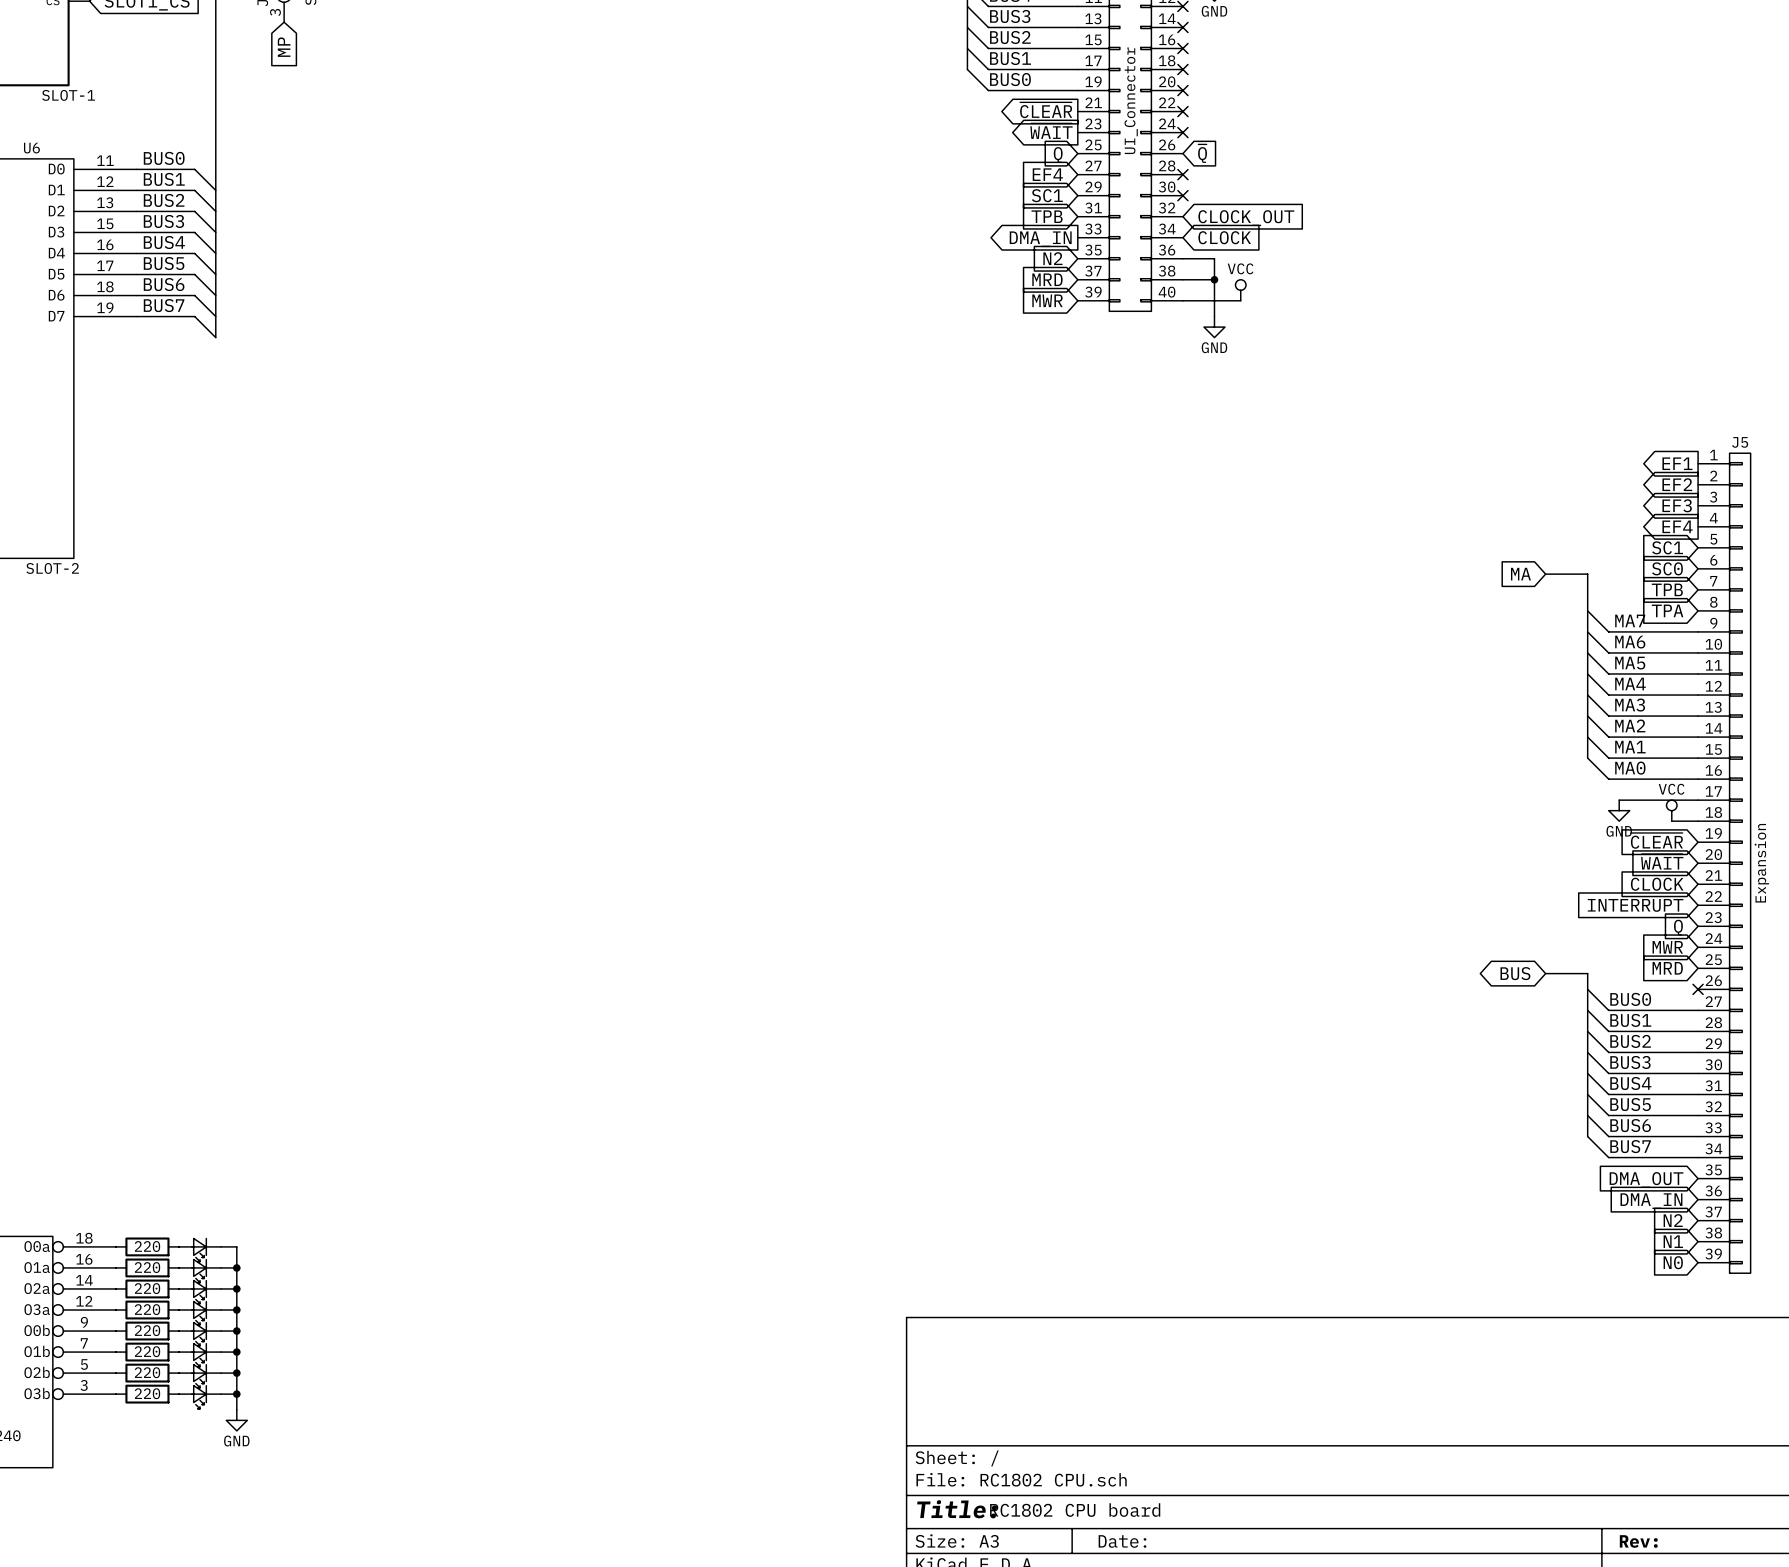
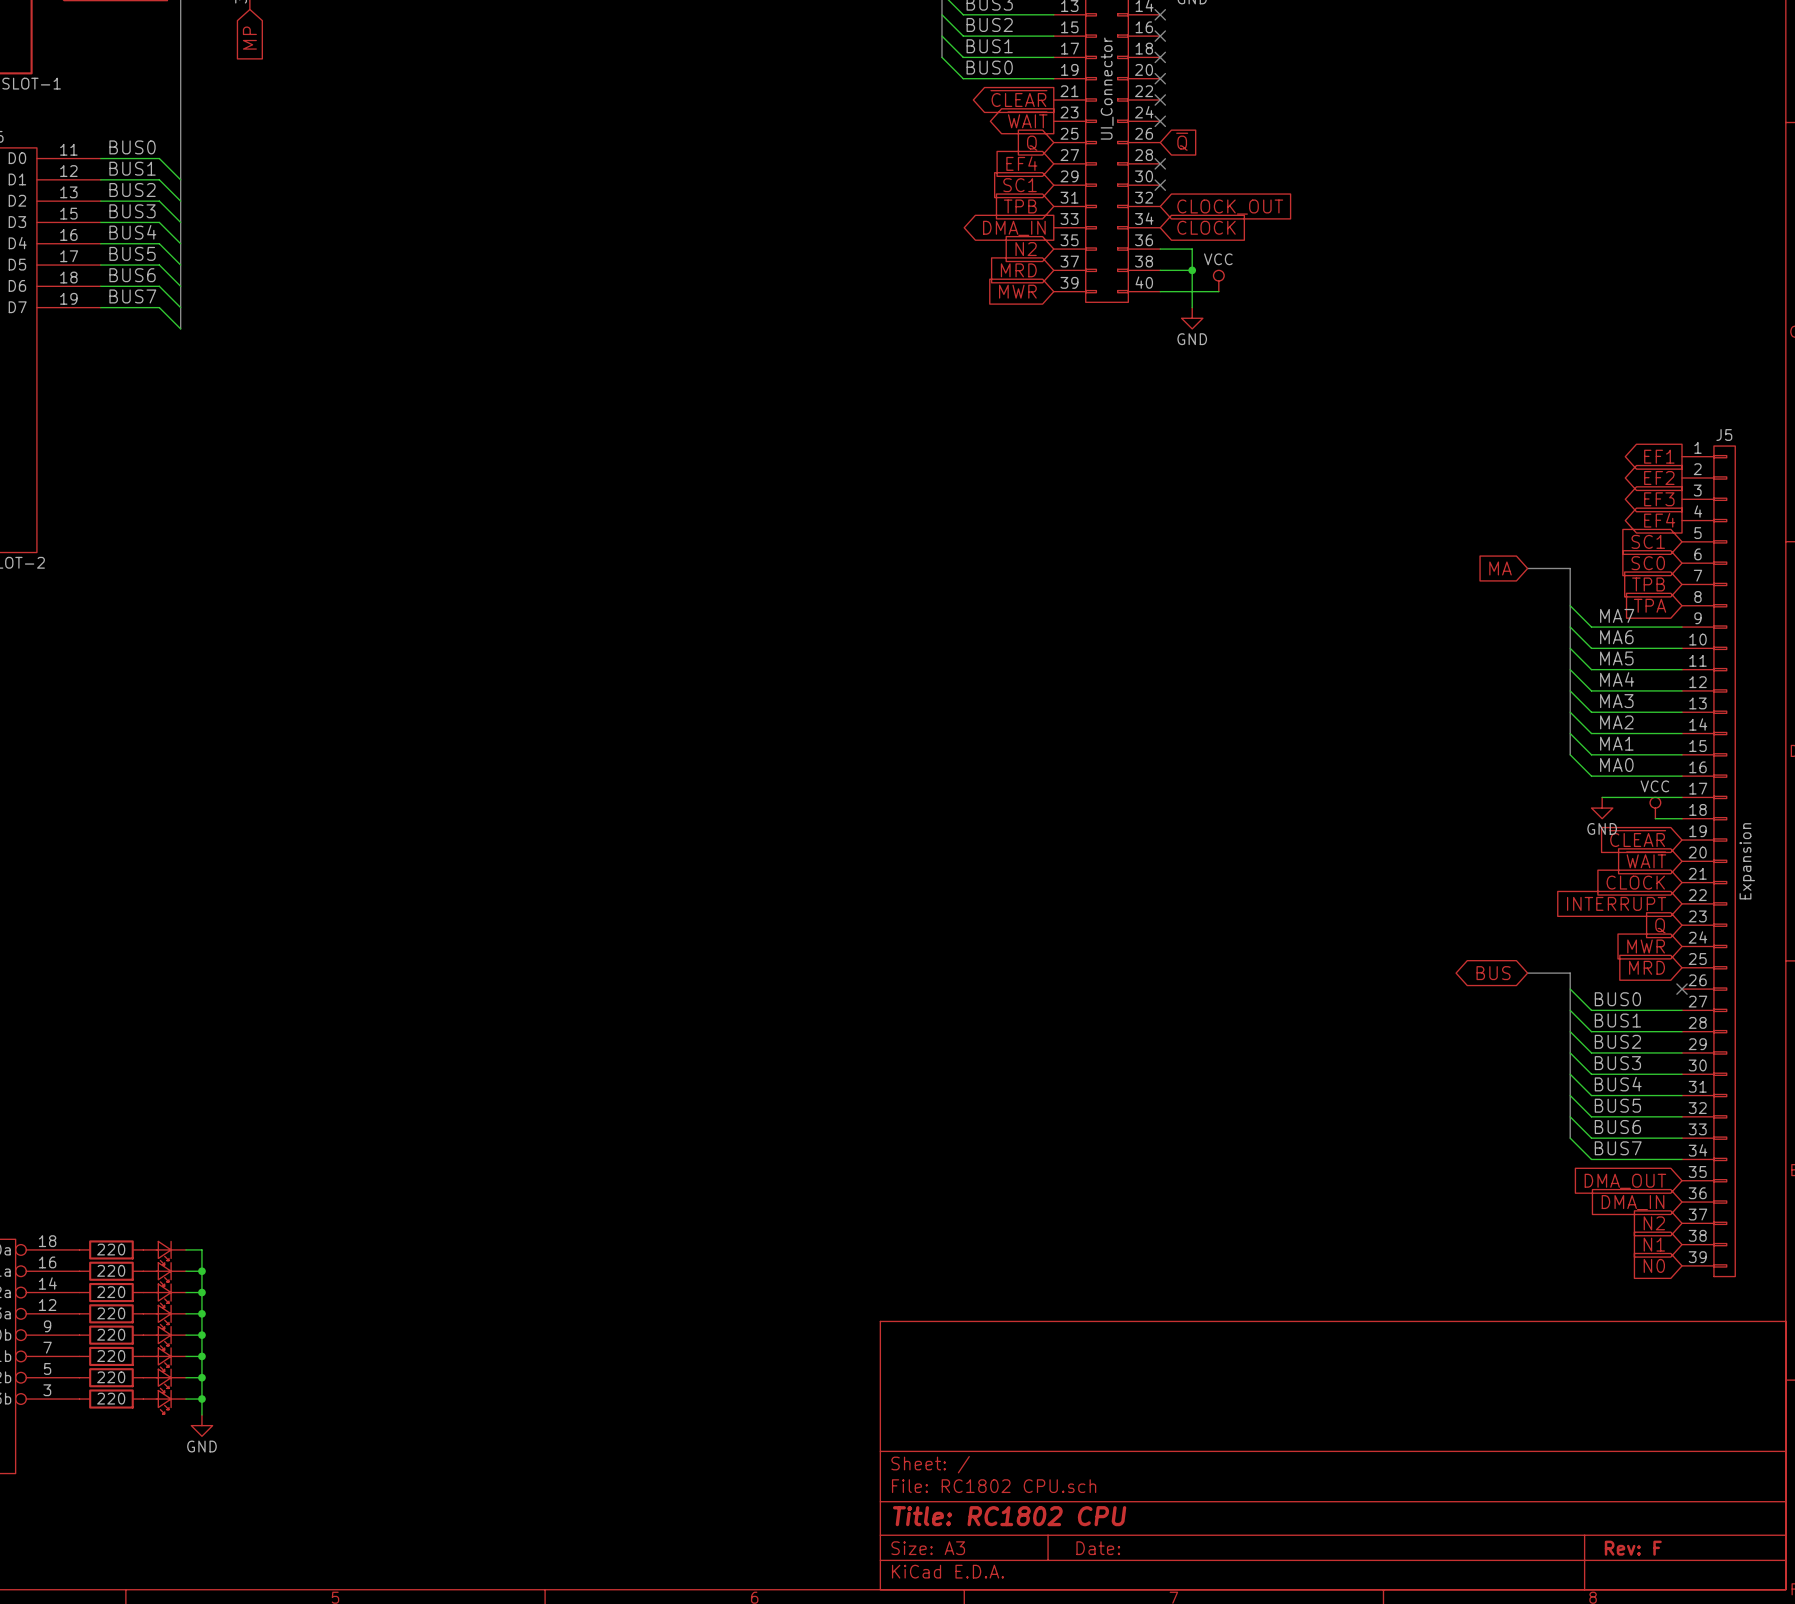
title block: Title: (957, 1509) -> Title: RC1802 CPU (1009, 1516)
text: RC1802 CPU board (1075, 1510) -> none
title block: Rev: (1638, 1541) -> Rev: F (1633, 1548)

